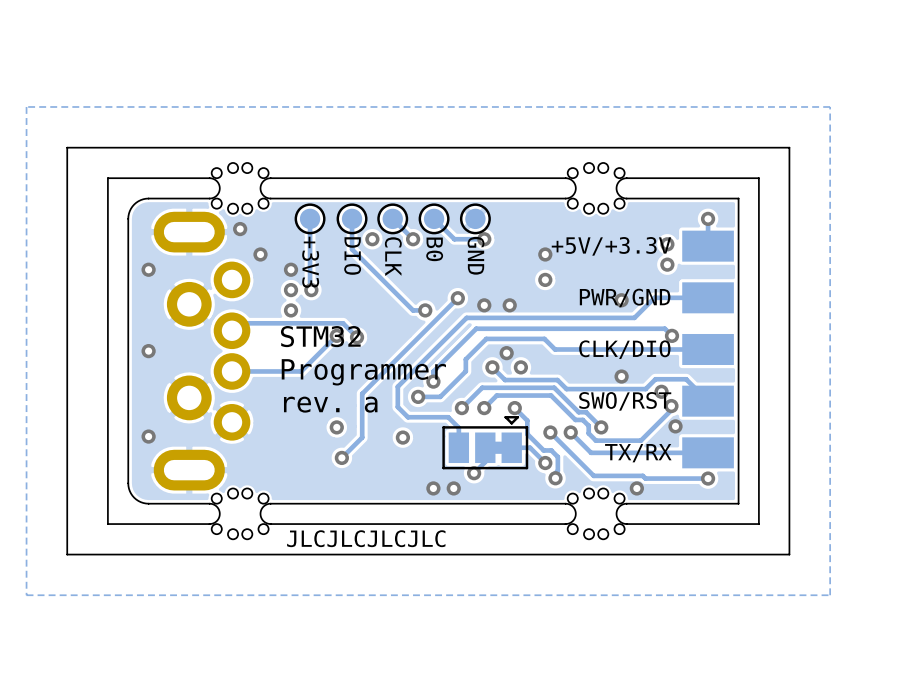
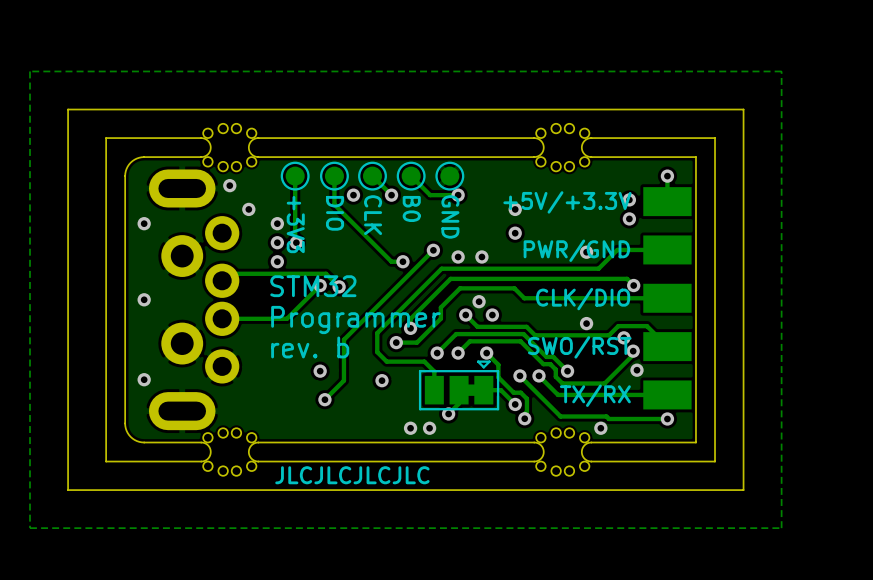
text: rev. a (330, 404) -> rev. b (310, 347)

